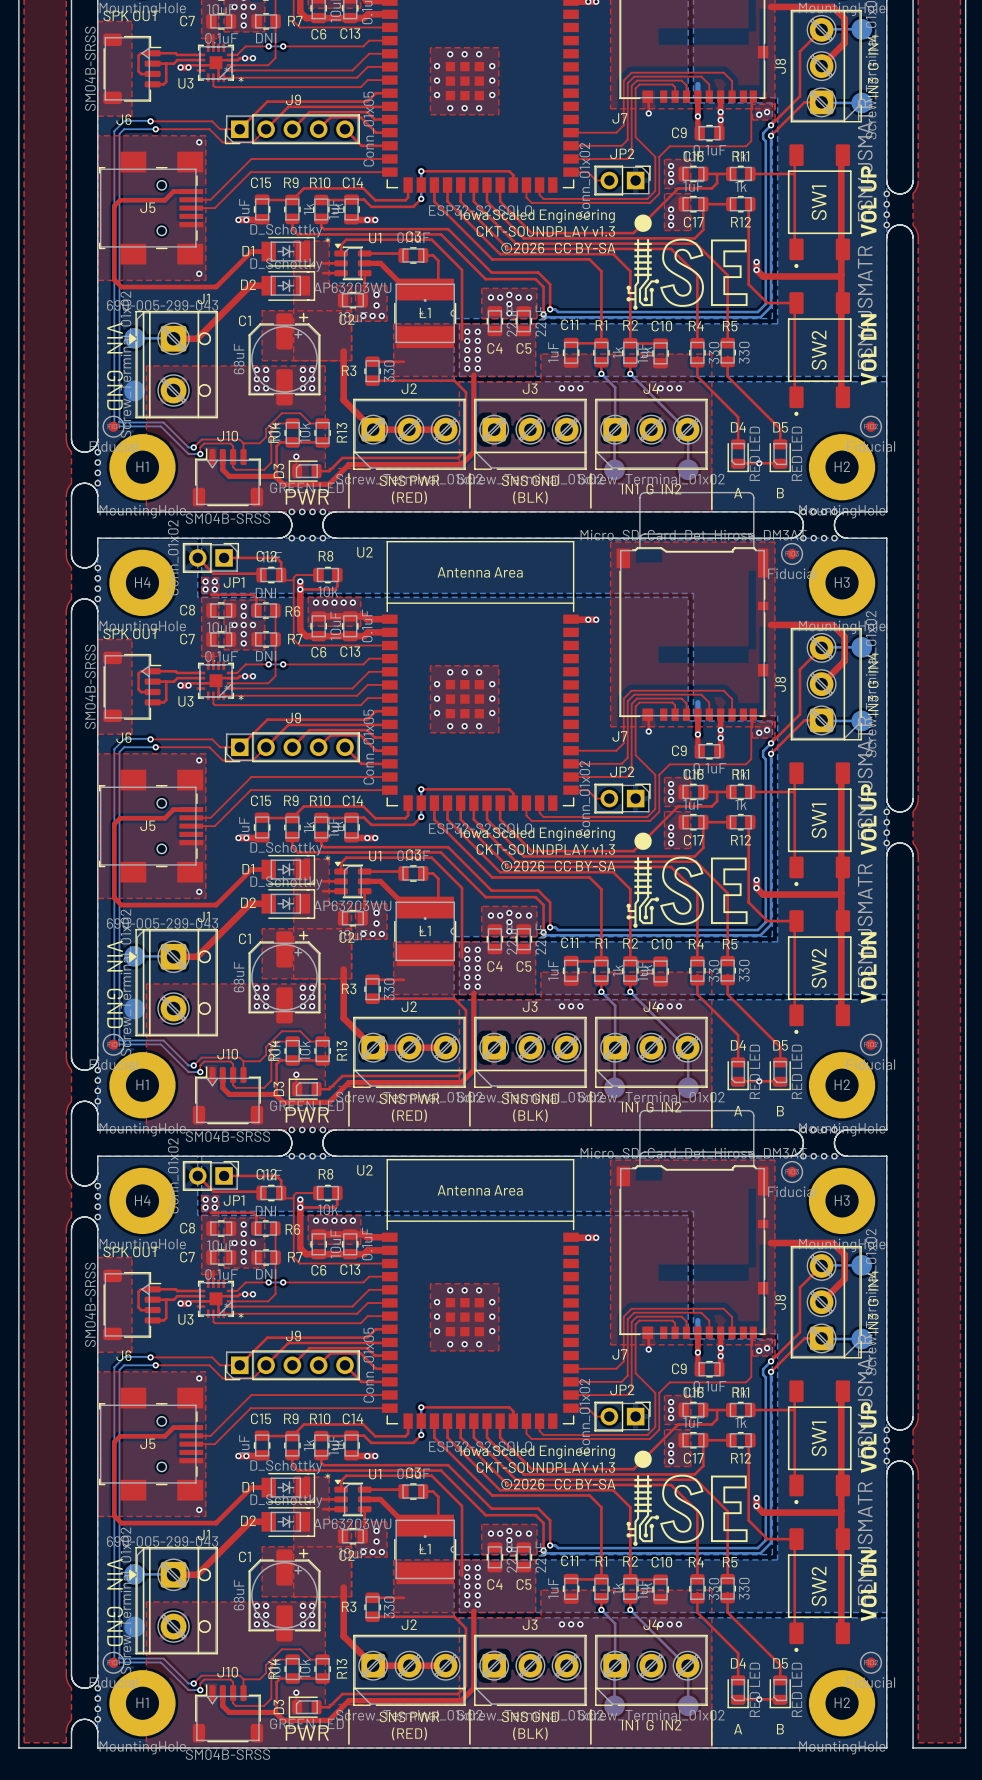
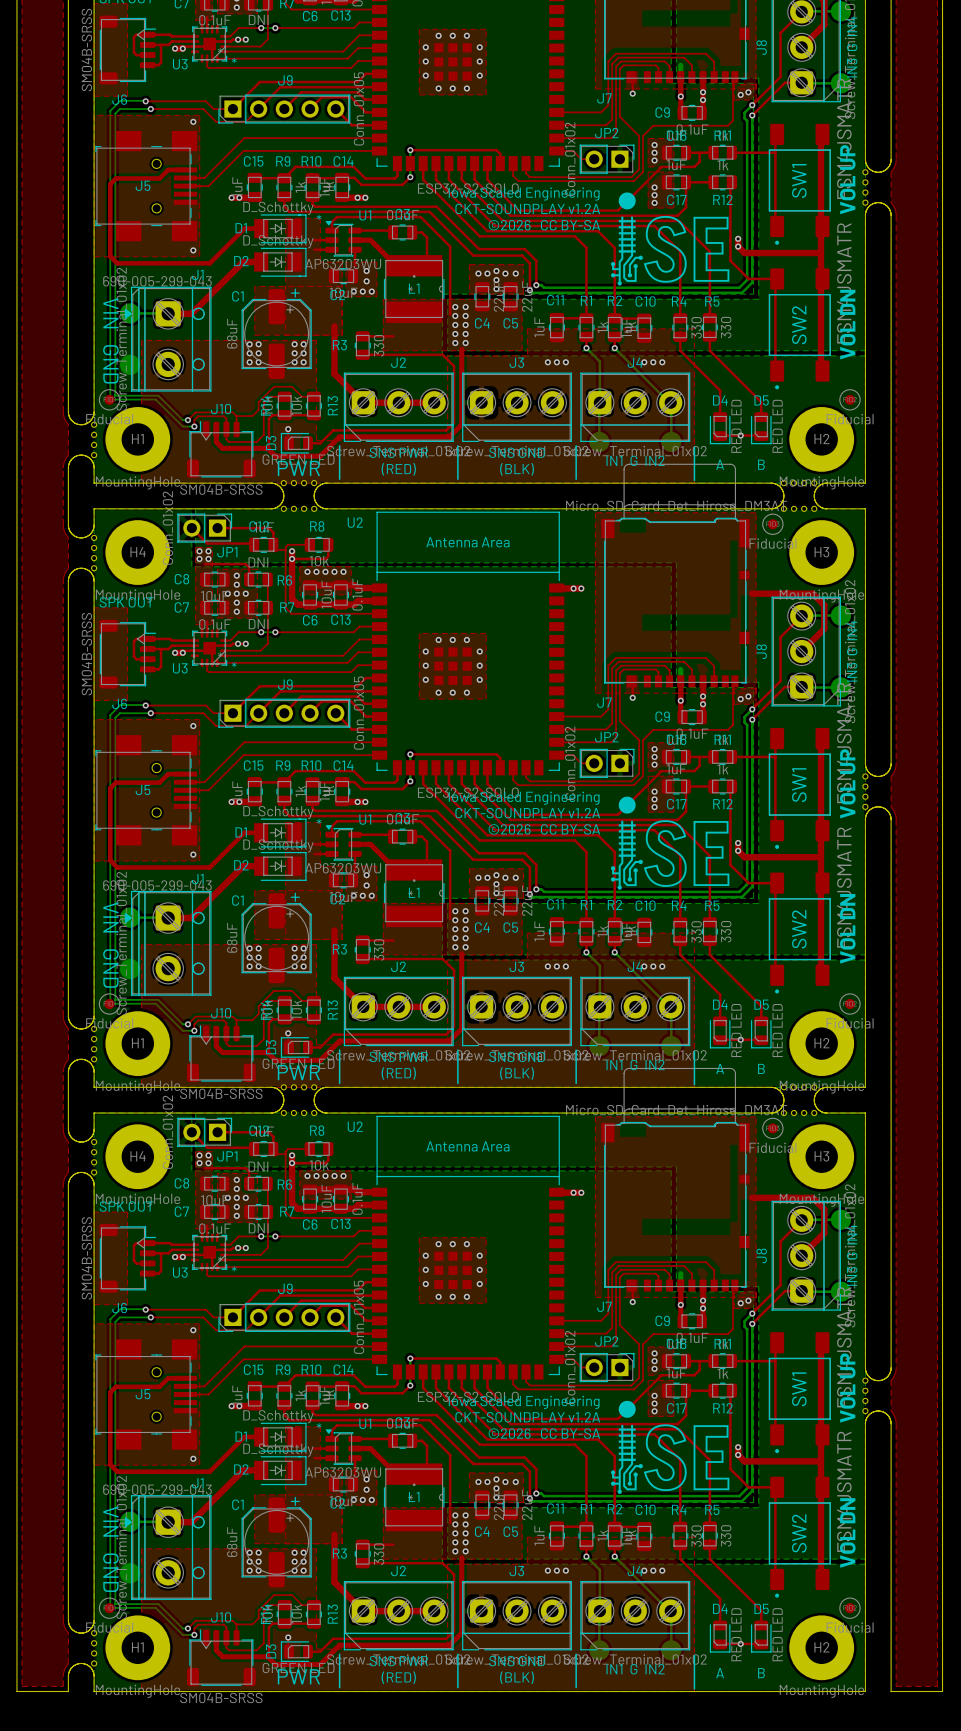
text: CKT-SOUNDPLAY v1.3 (545, 231) -> CKT-SOUNDPLAY v1.2A (527, 208)
text: CKT-SOUNDPLAY v1.3 (545, 849) -> CKT-SOUNDPLAY v1.2A (527, 813)
text: CKT-SOUNDPLAY v1.3 (545, 1467) -> CKT-SOUNDPLAY v1.2A (527, 1417)

